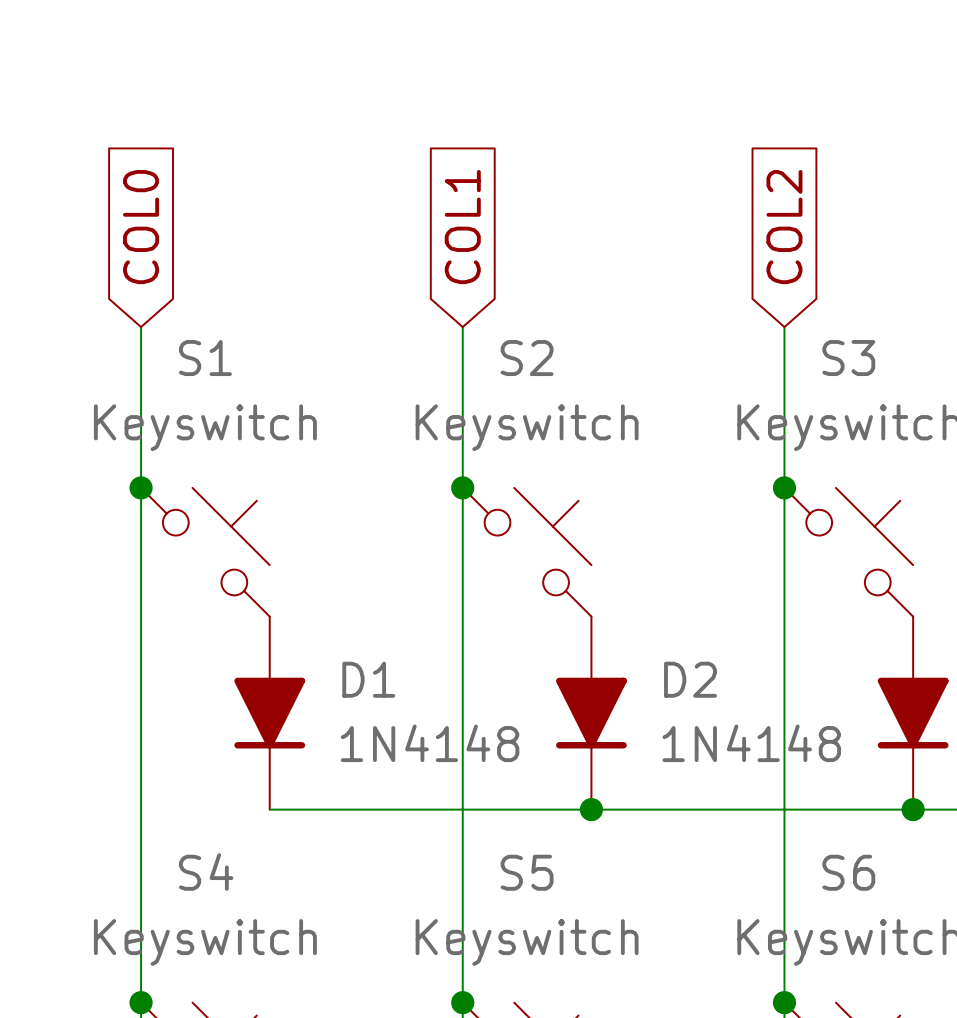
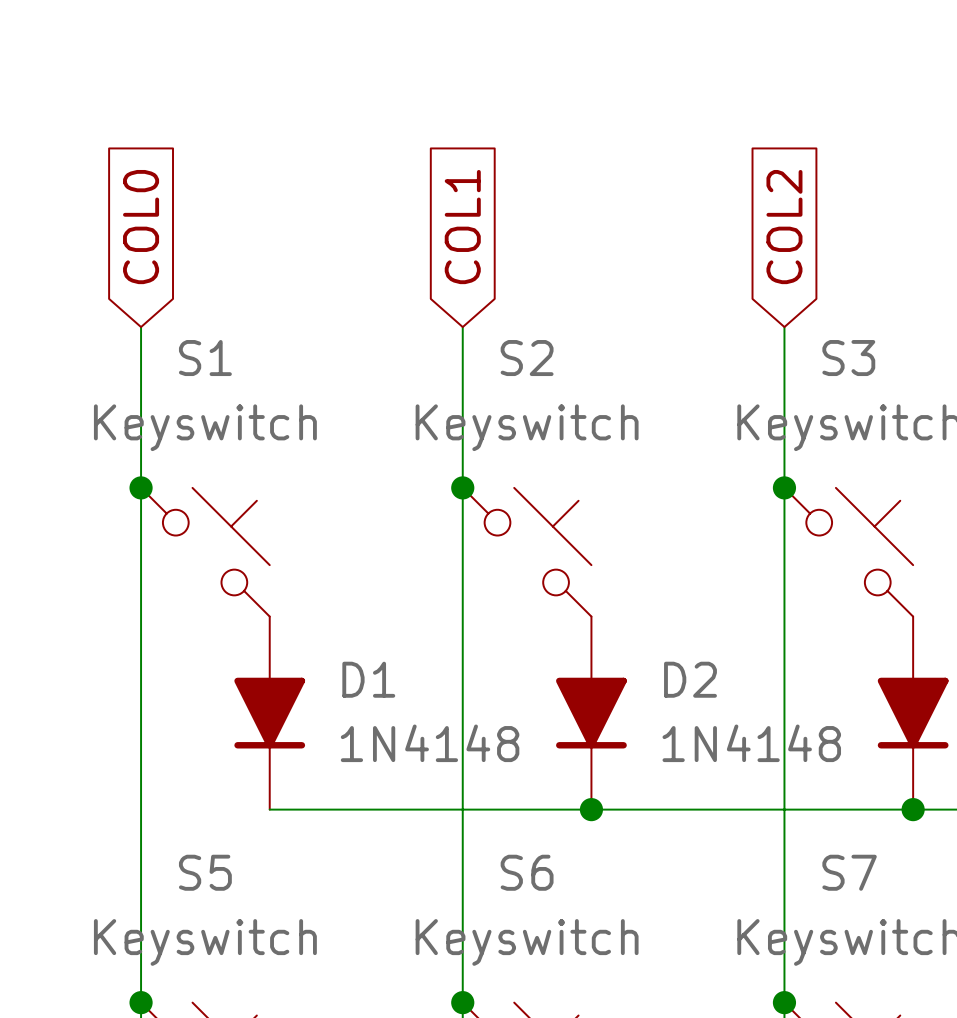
S4 name: S4 (206, 871) -> S5 (205, 872)
S5 name: S5 (527, 872) -> S6 (527, 872)
S6 name: S6 (848, 872) -> S7 (849, 872)

